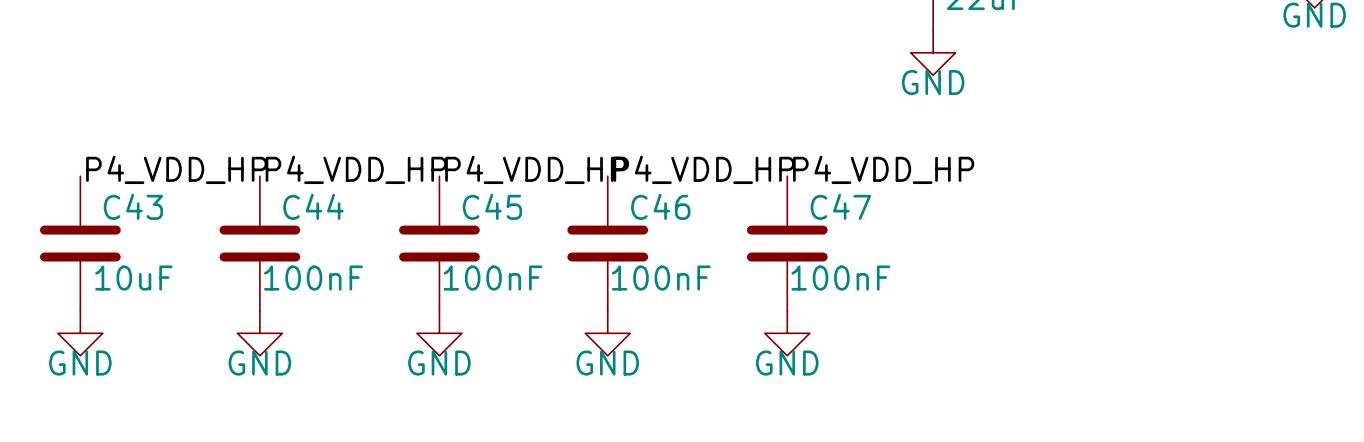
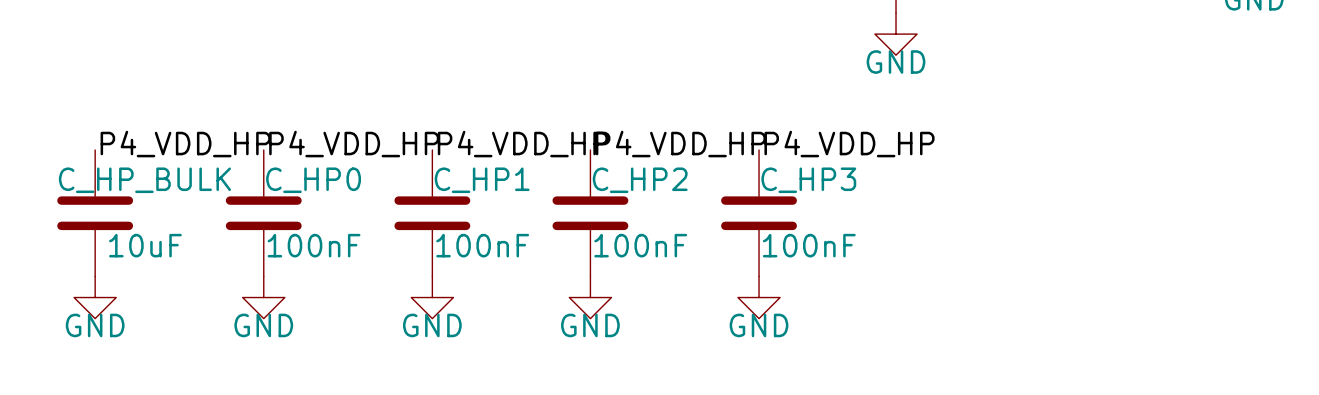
C43 name: C43 (133, 206) -> C_HP_BULK (144, 180)
C44 name: C44 (313, 206) -> C_HP0 (313, 180)
C45 name: C45 (492, 206) -> C_HP1 (482, 180)
C46 name: C46 (660, 206) -> C_HP2 (640, 180)
C47 name: C47 (840, 206) -> C_HP3 (808, 180)

